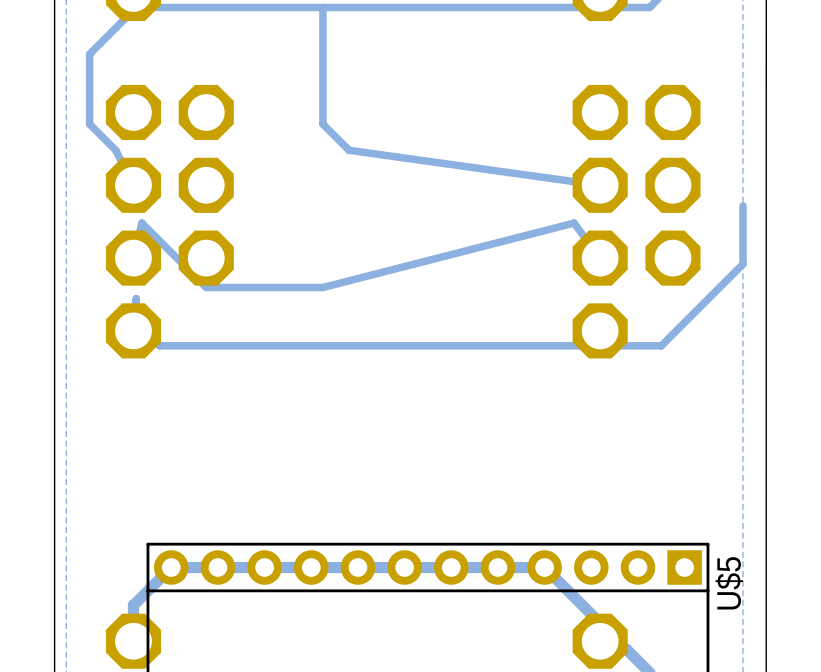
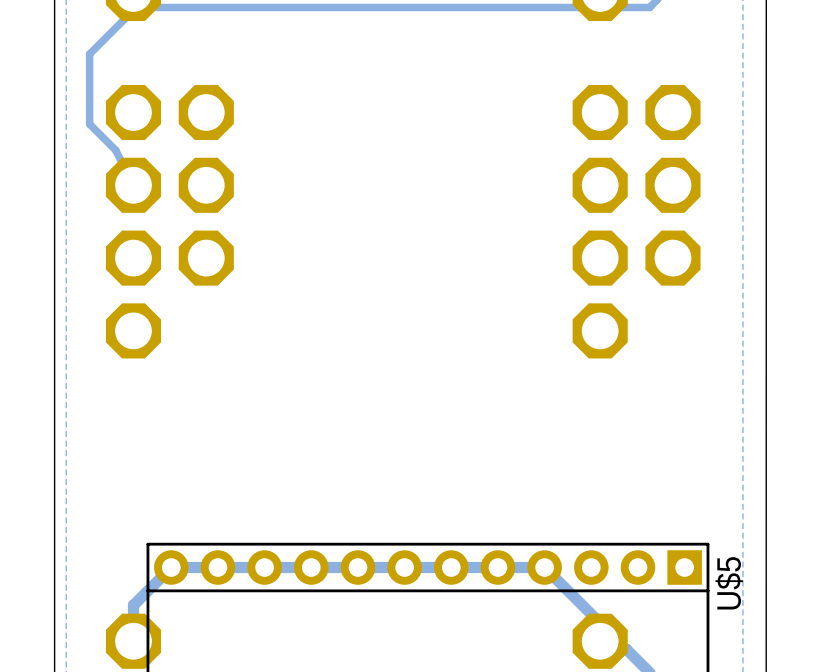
track: (322, 7) (322, 124) (349, 150) (600, 185) -> none
track: (742, 205) (742, 264) (661, 345) (159, 345) (136, 322) (136, 298) (133, 330) -> none
track: (600, 258) (574, 223) (322, 287) (206, 287) (141, 223) (133, 258) -> none

